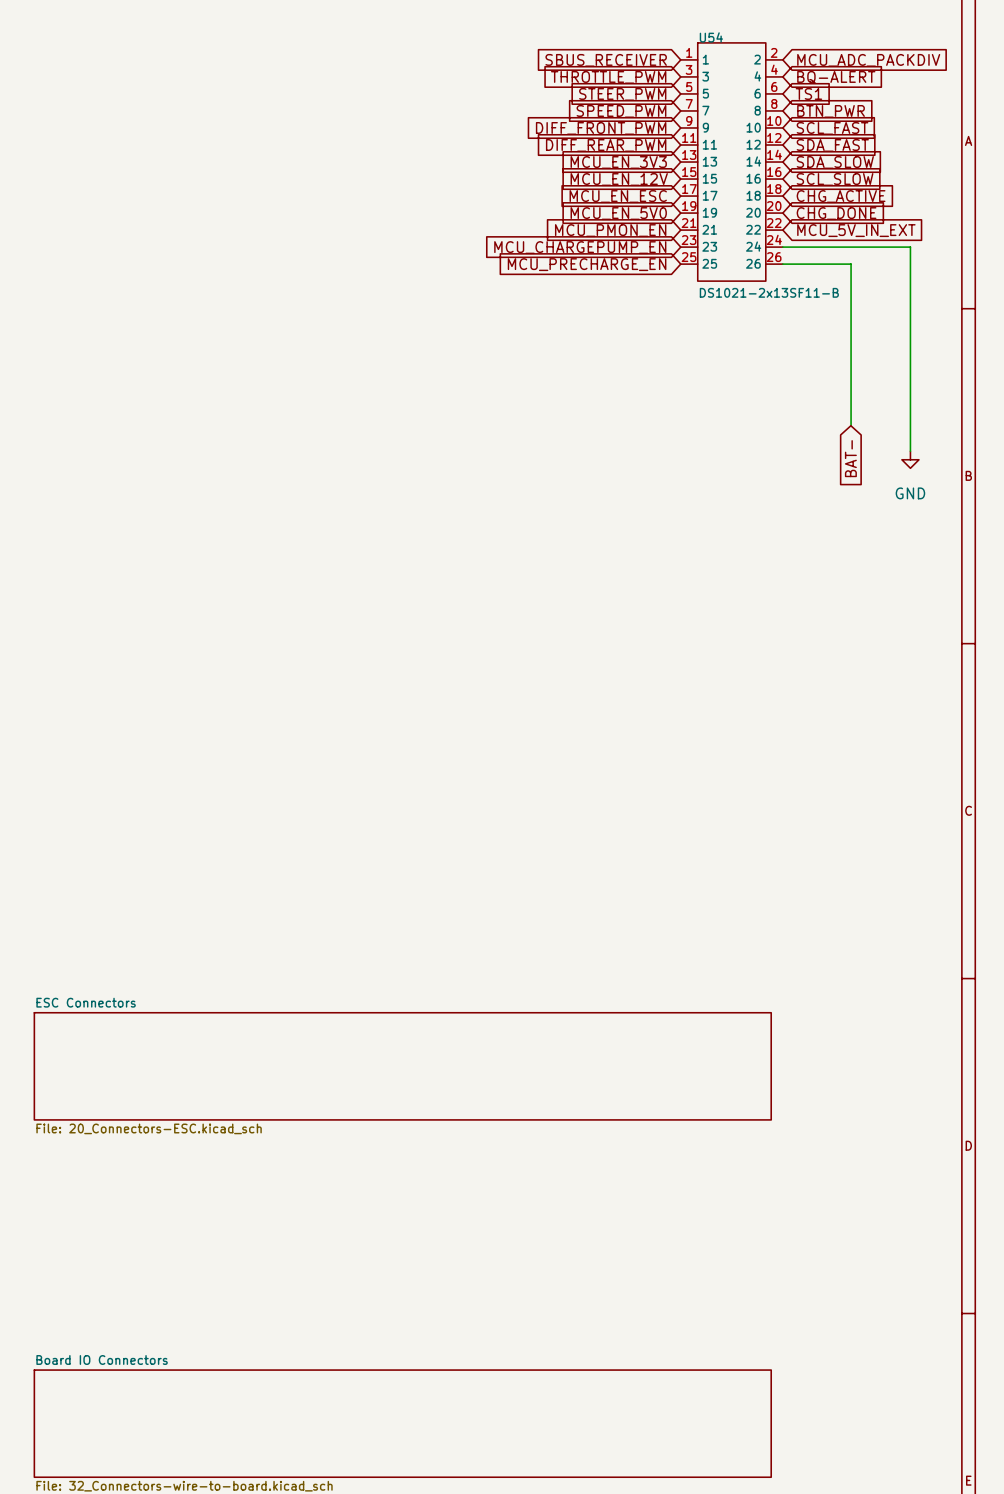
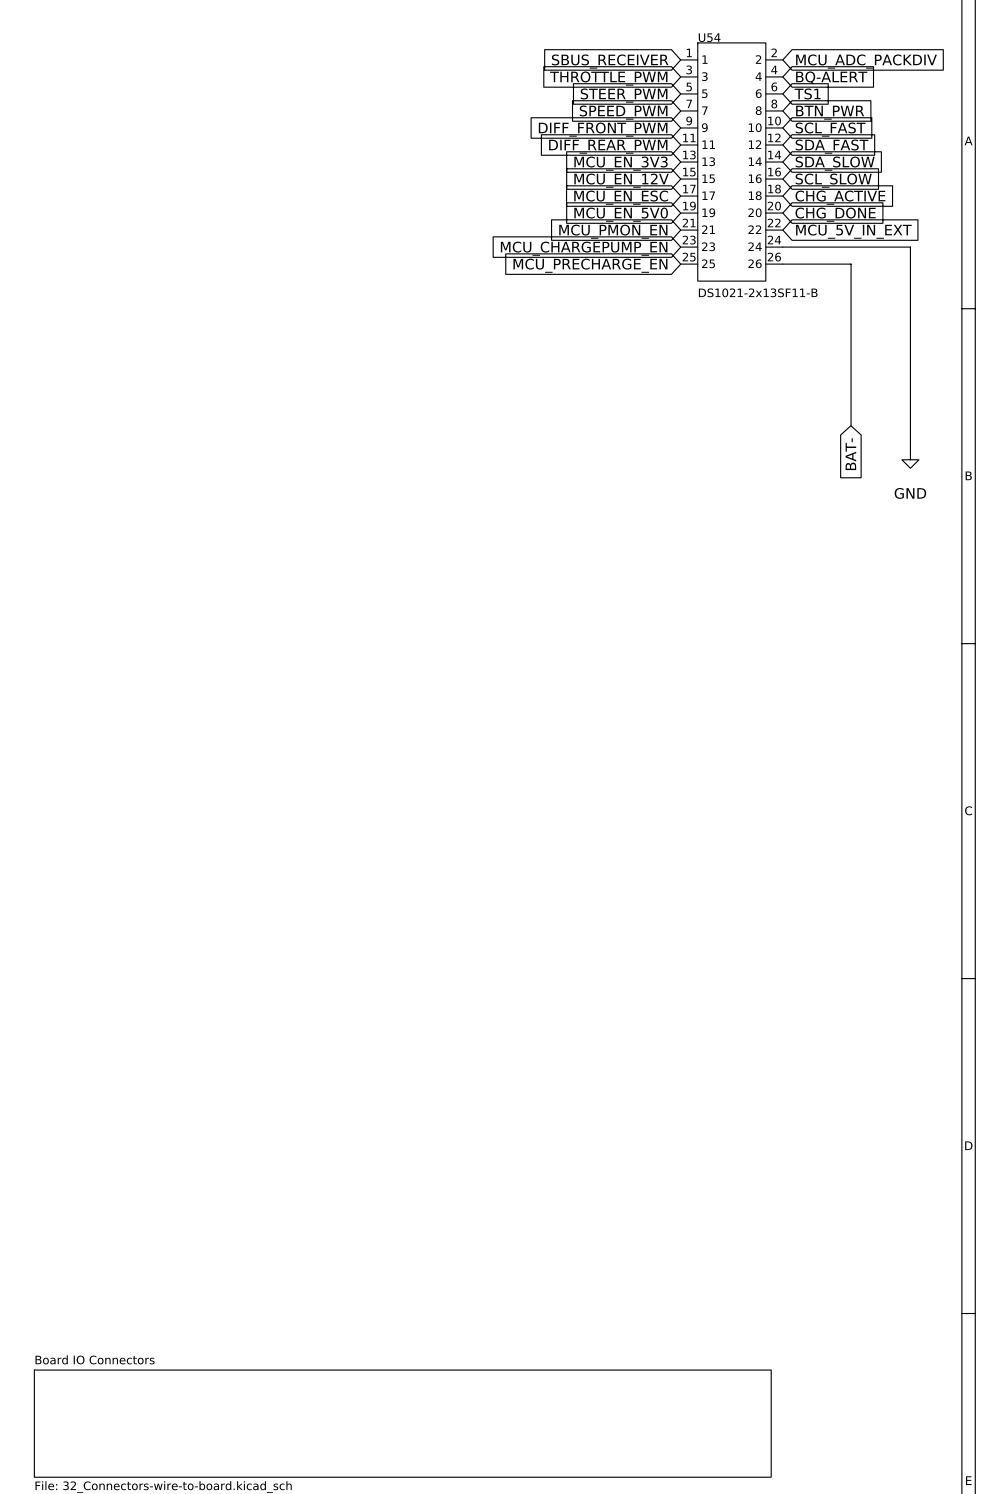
sheet ESC Connectors: File: 20_Connectors-ESC.kicad_sch (402, 1066) -> none

